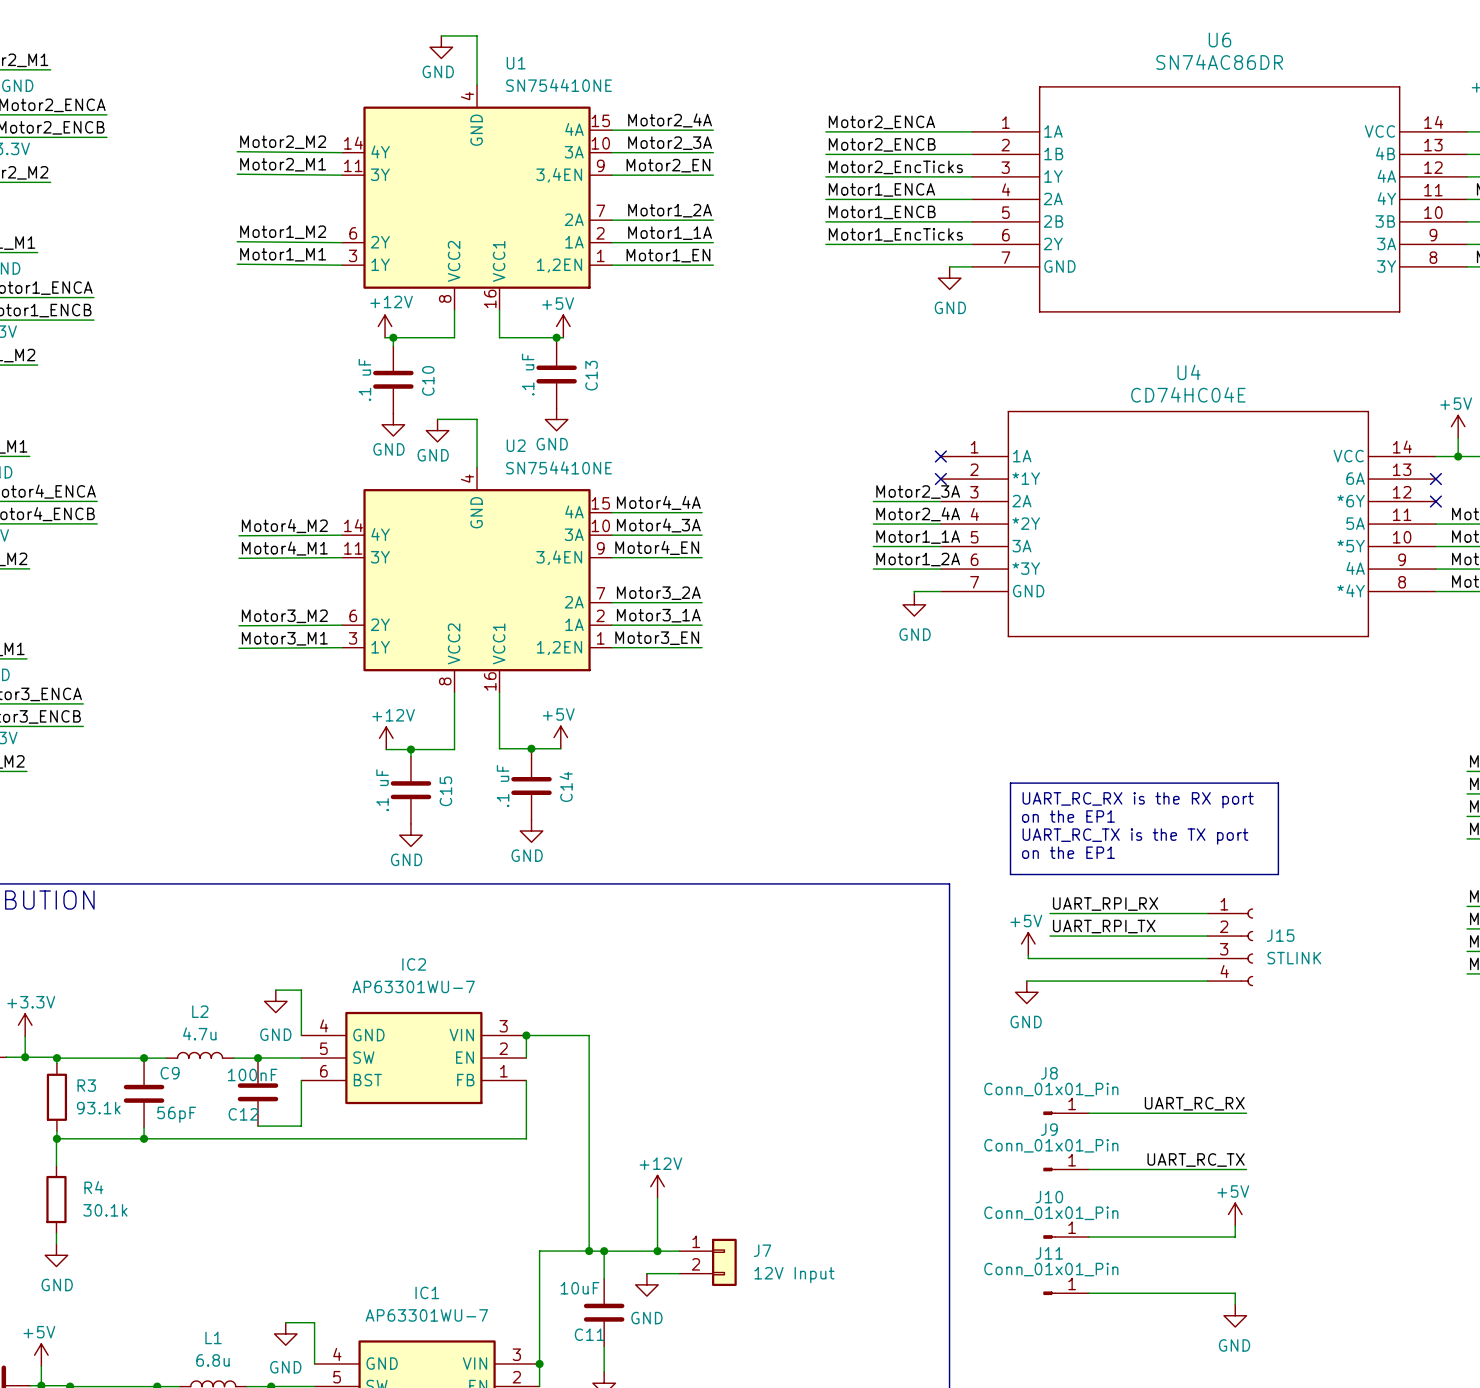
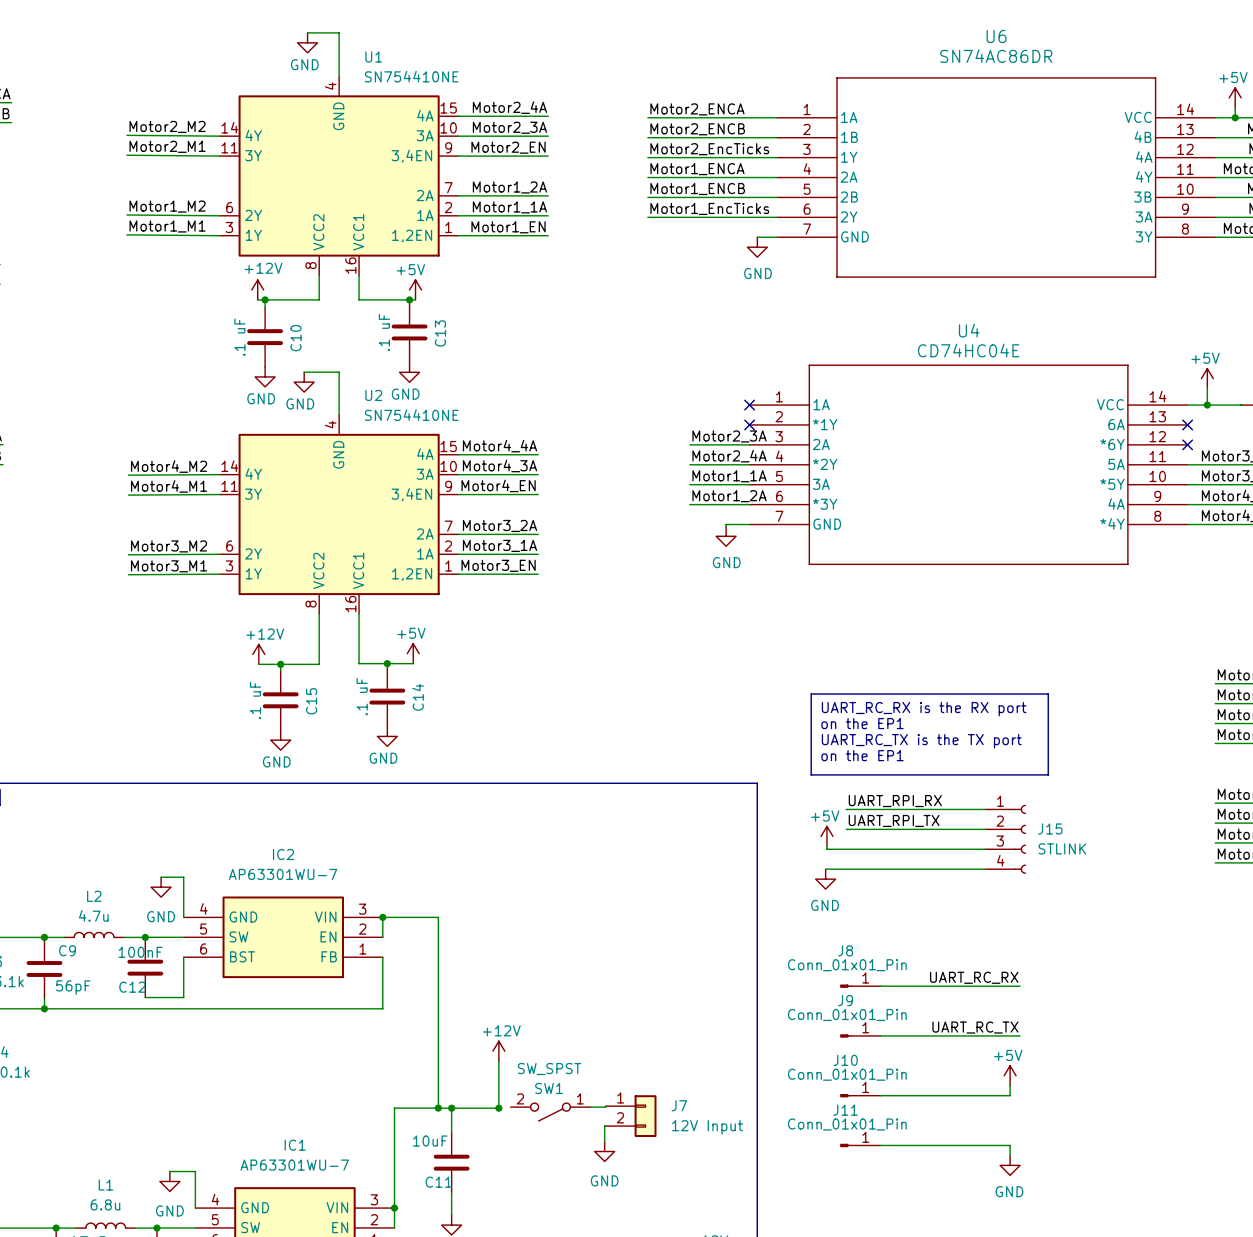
wire: none -> (605, 1106) (590, 1107)
wire: (657, 1251) (679, 1251) -> none
SW1: none -> SW_SPST (550, 1112)
J7 position: (708, 1262) -> (631, 1116)
wire: none -> (605, 1126) (604, 1141)
wire: (646, 1273) (679, 1273) -> none
power symbol position: GND (646, 1284) -> GND (604, 1151)

